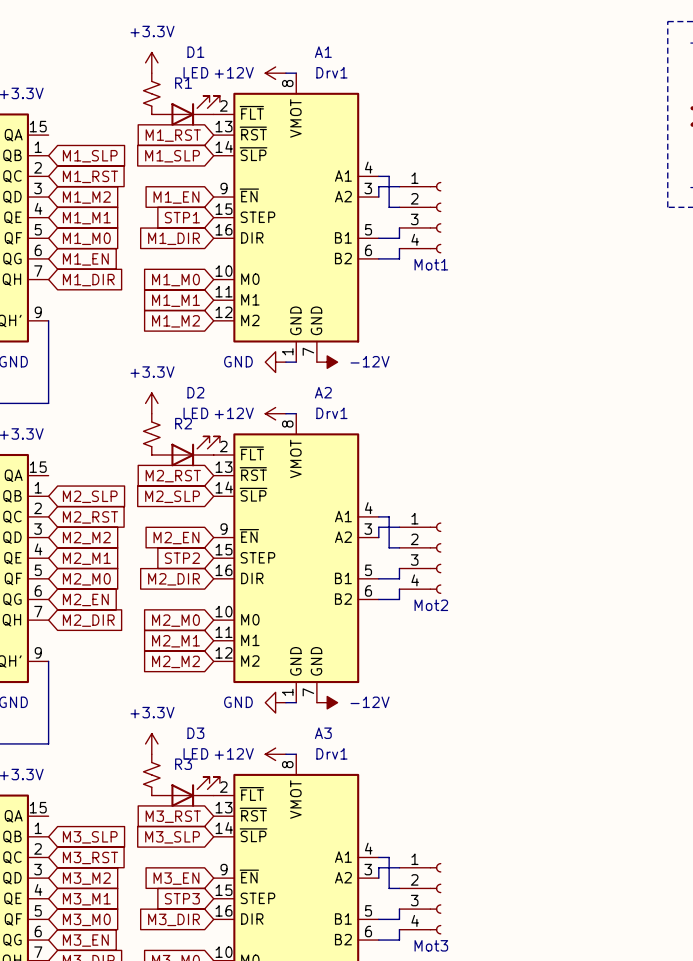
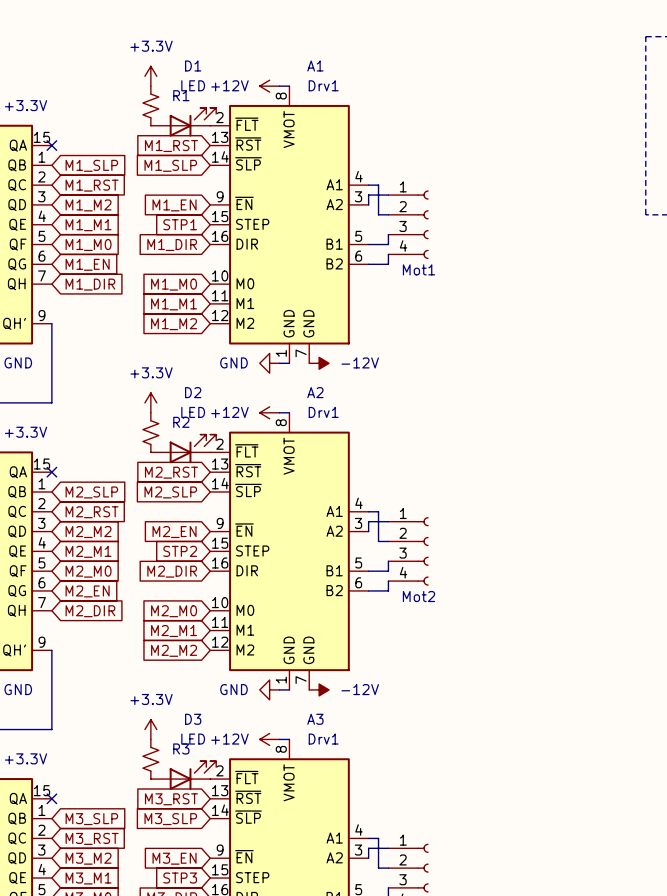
no-connect mark: none -> (51, 145)
no-connect mark: none -> (51, 472)
no-connect mark: none -> (51, 798)

